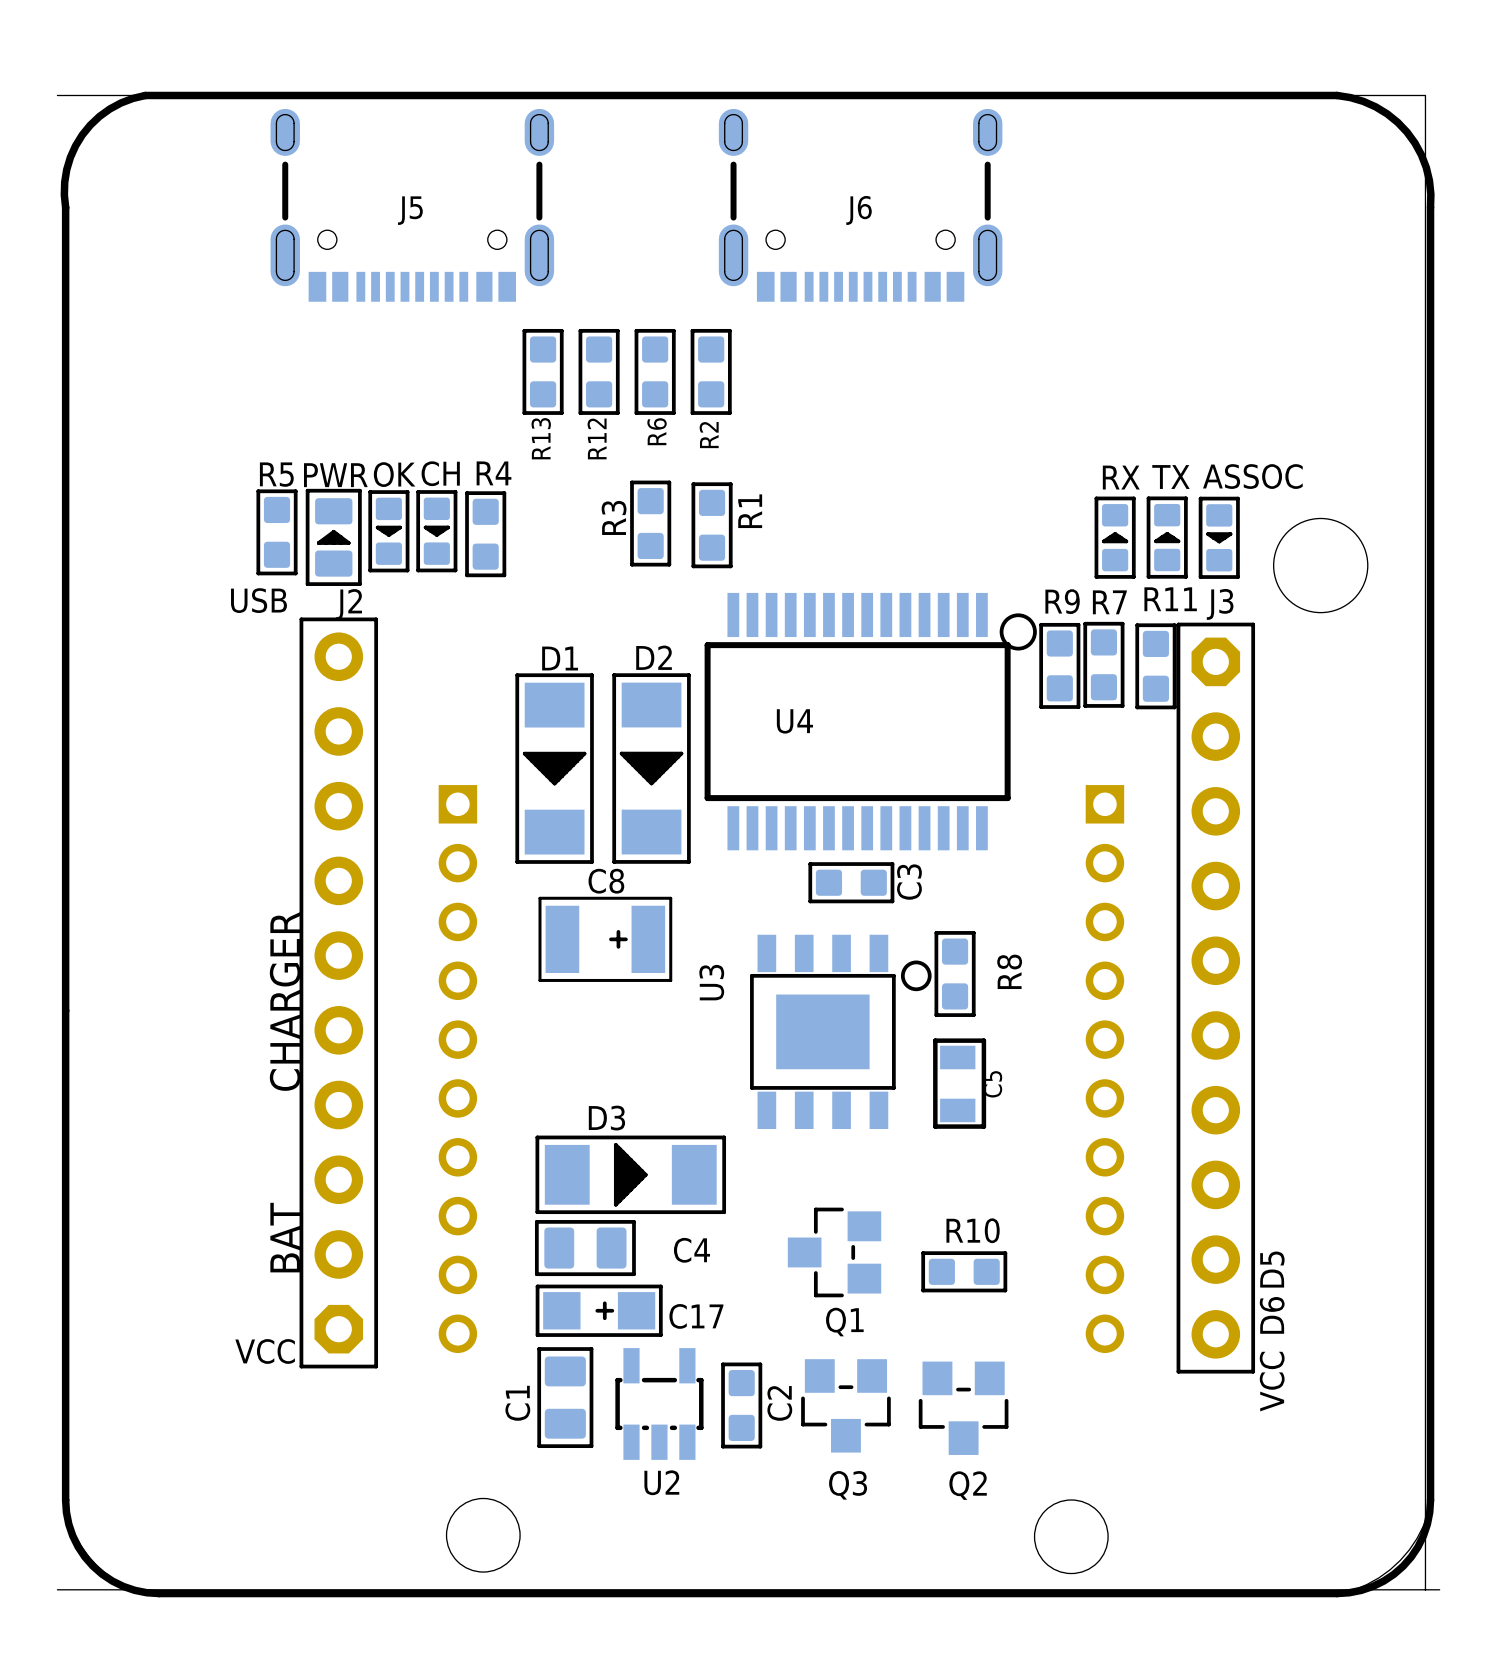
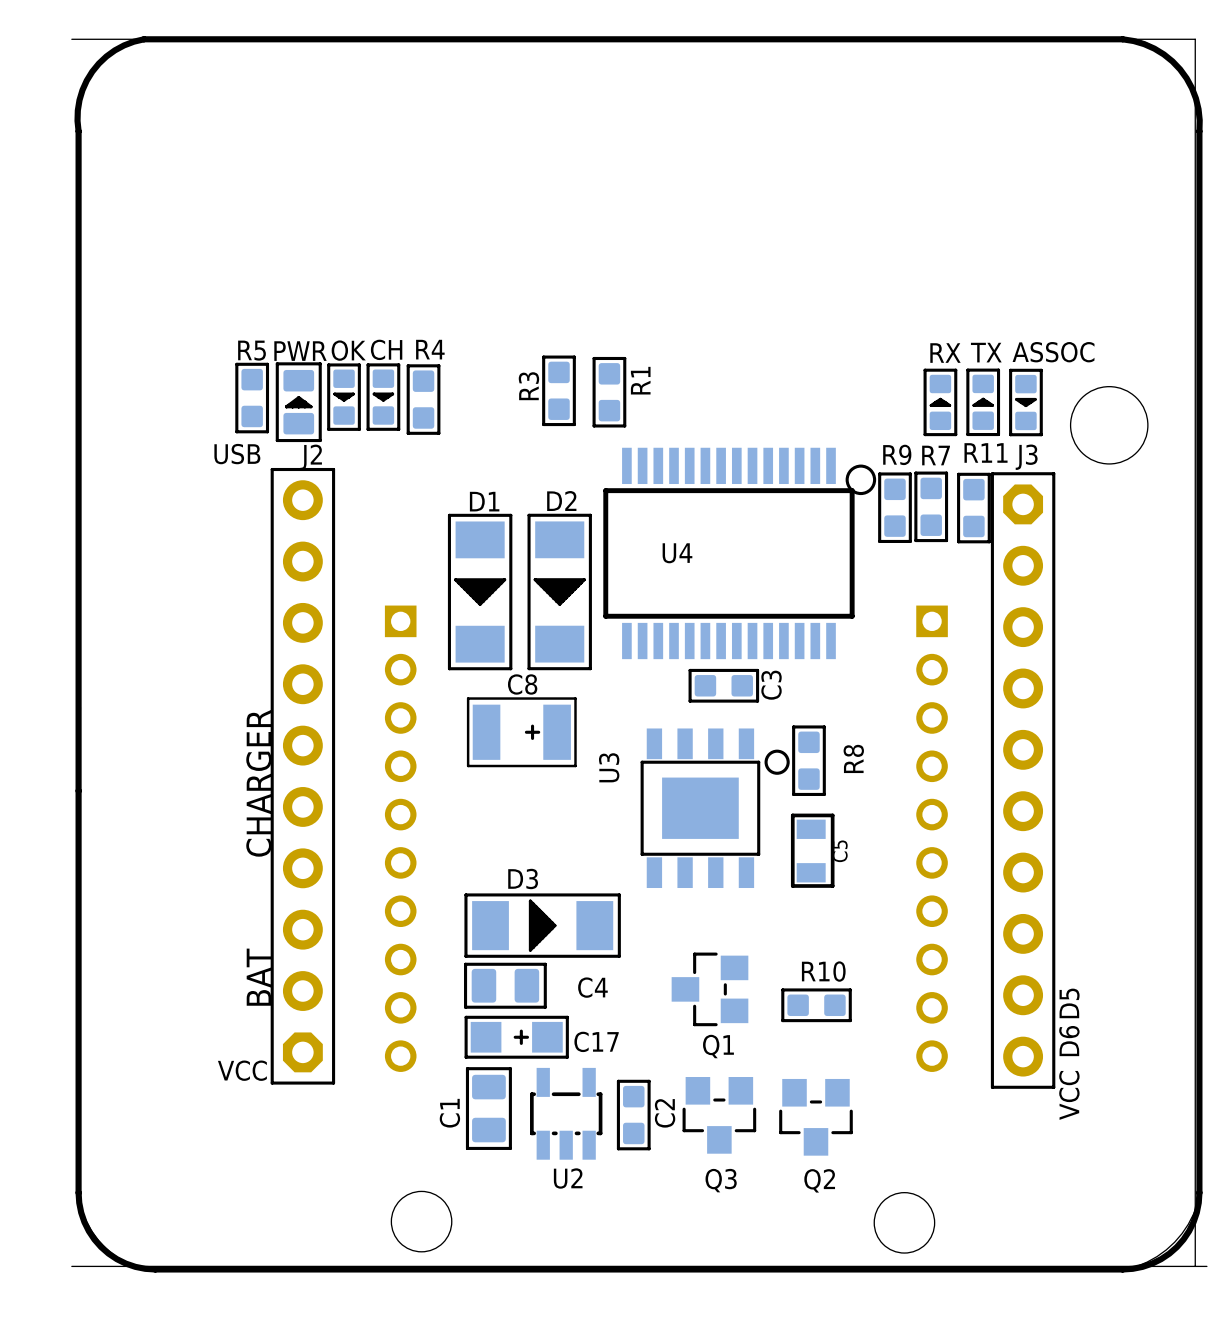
J5: (412, 205) -> none
J6: (860, 205) -> none
R13: (543, 371) -> none
R12: (599, 371) -> none
R6: (655, 371) -> none
R2: (711, 371) -> none

